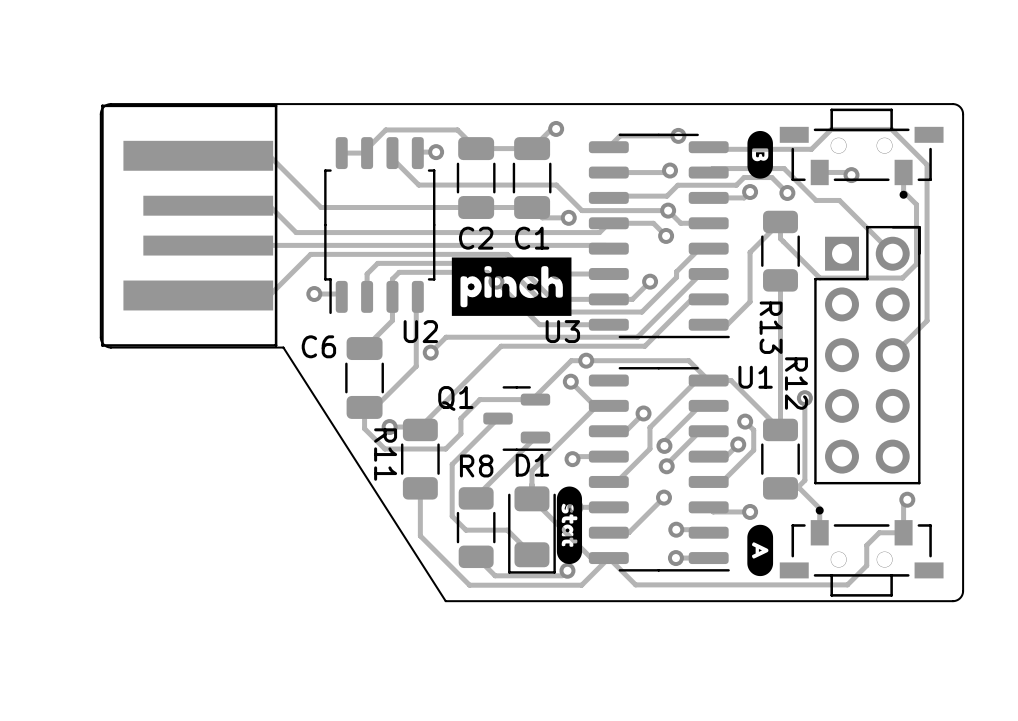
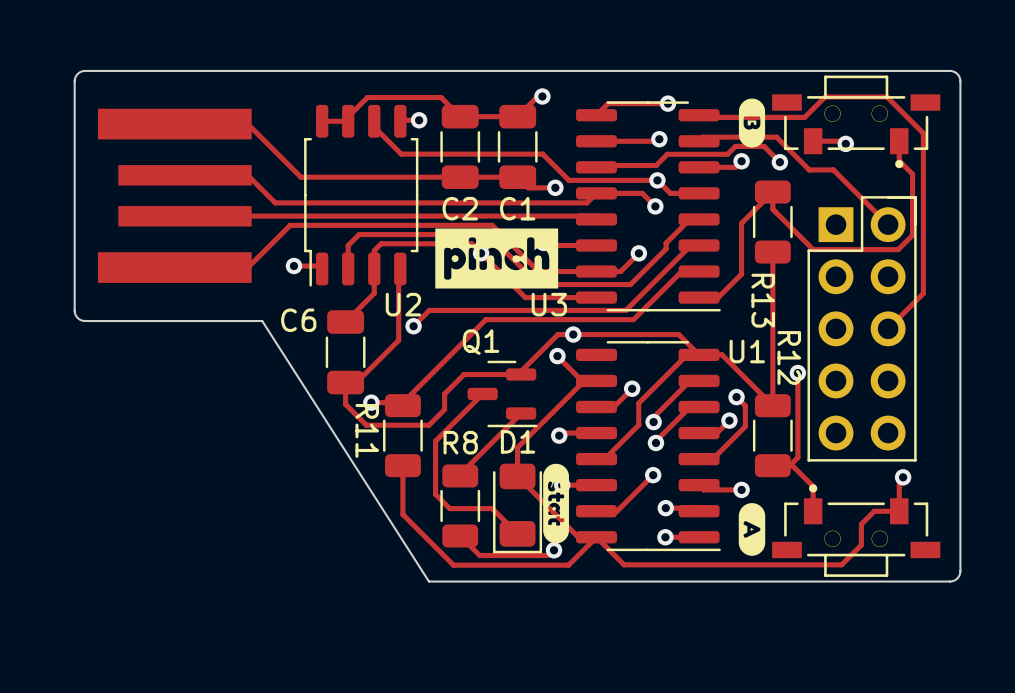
part footprint: [101, 104, 278, 347] -> [97, 108, 252, 283]
Q1 name position: Q1 (455, 398) -> Q1 (481, 342)

